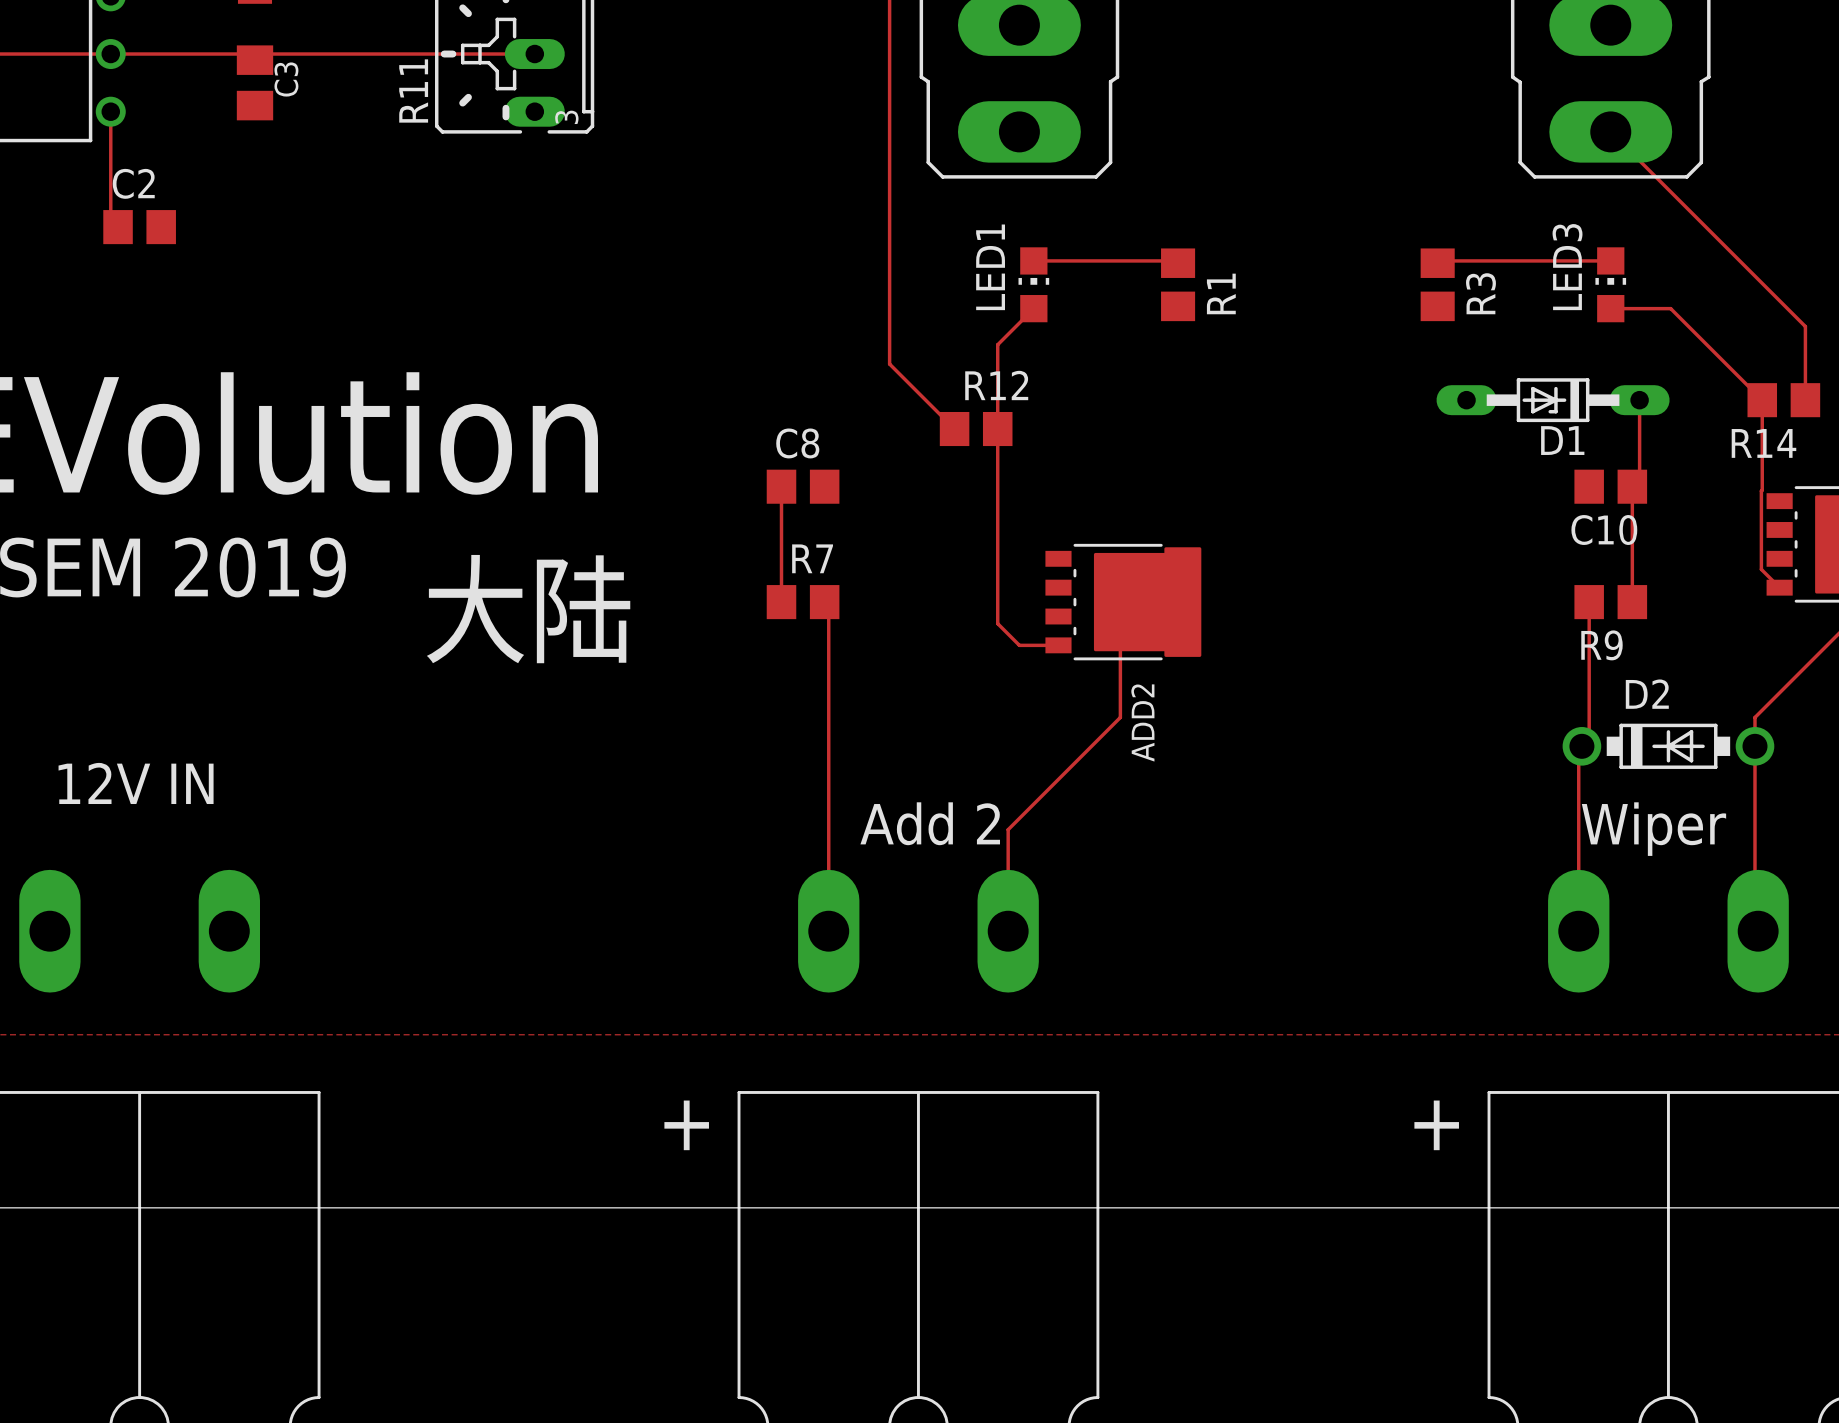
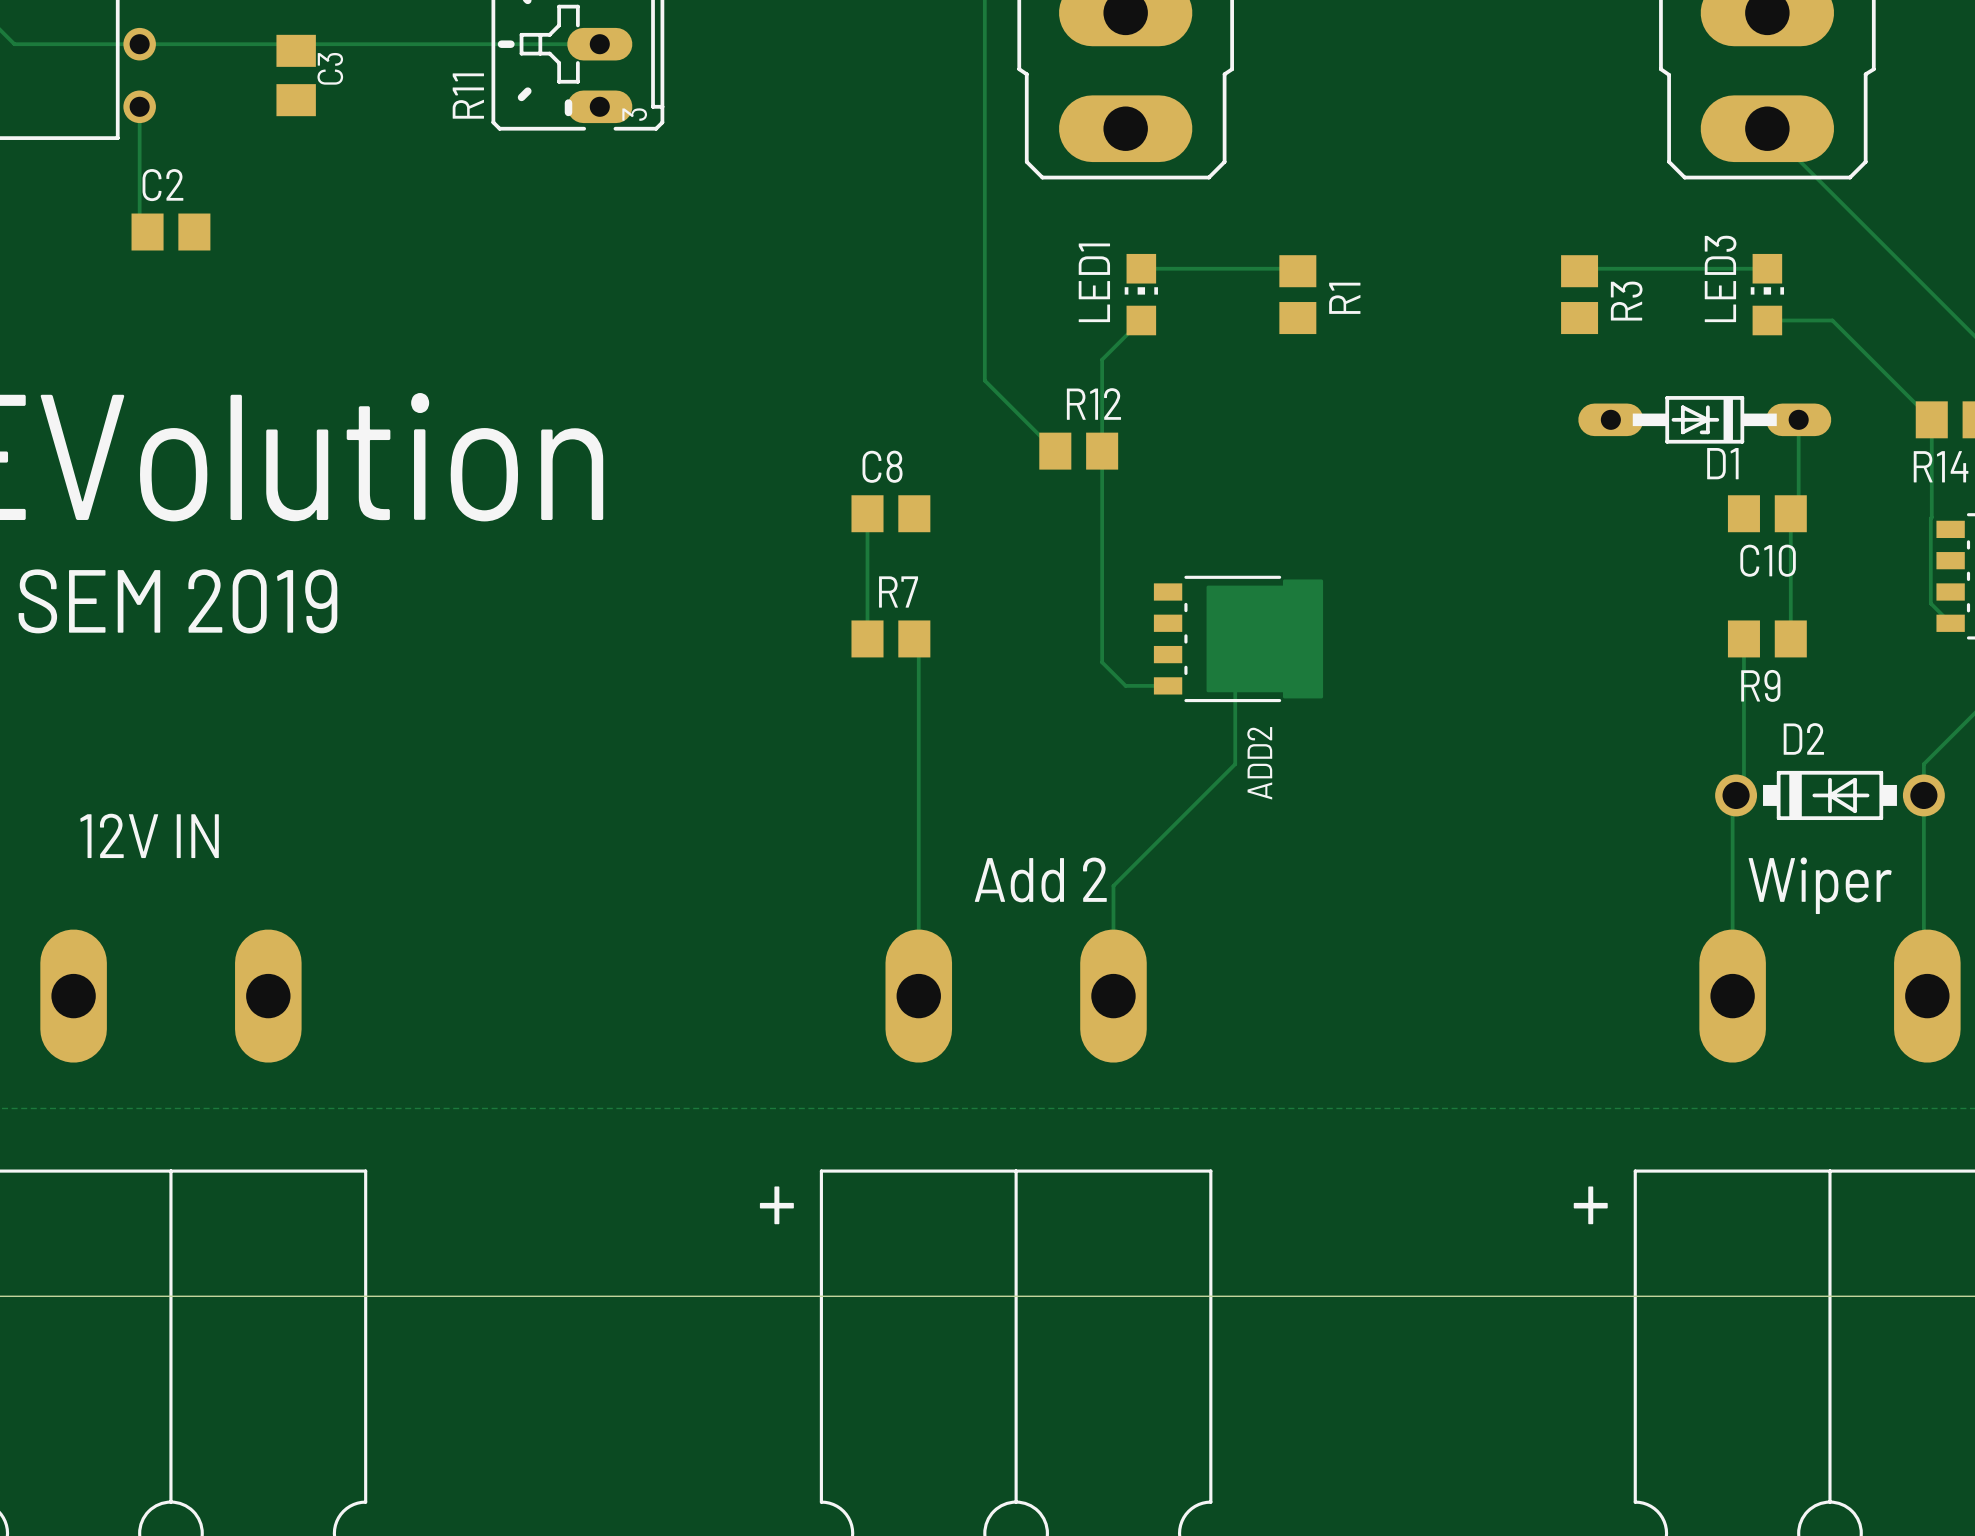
text: 大陆 (528, 609) -> none

